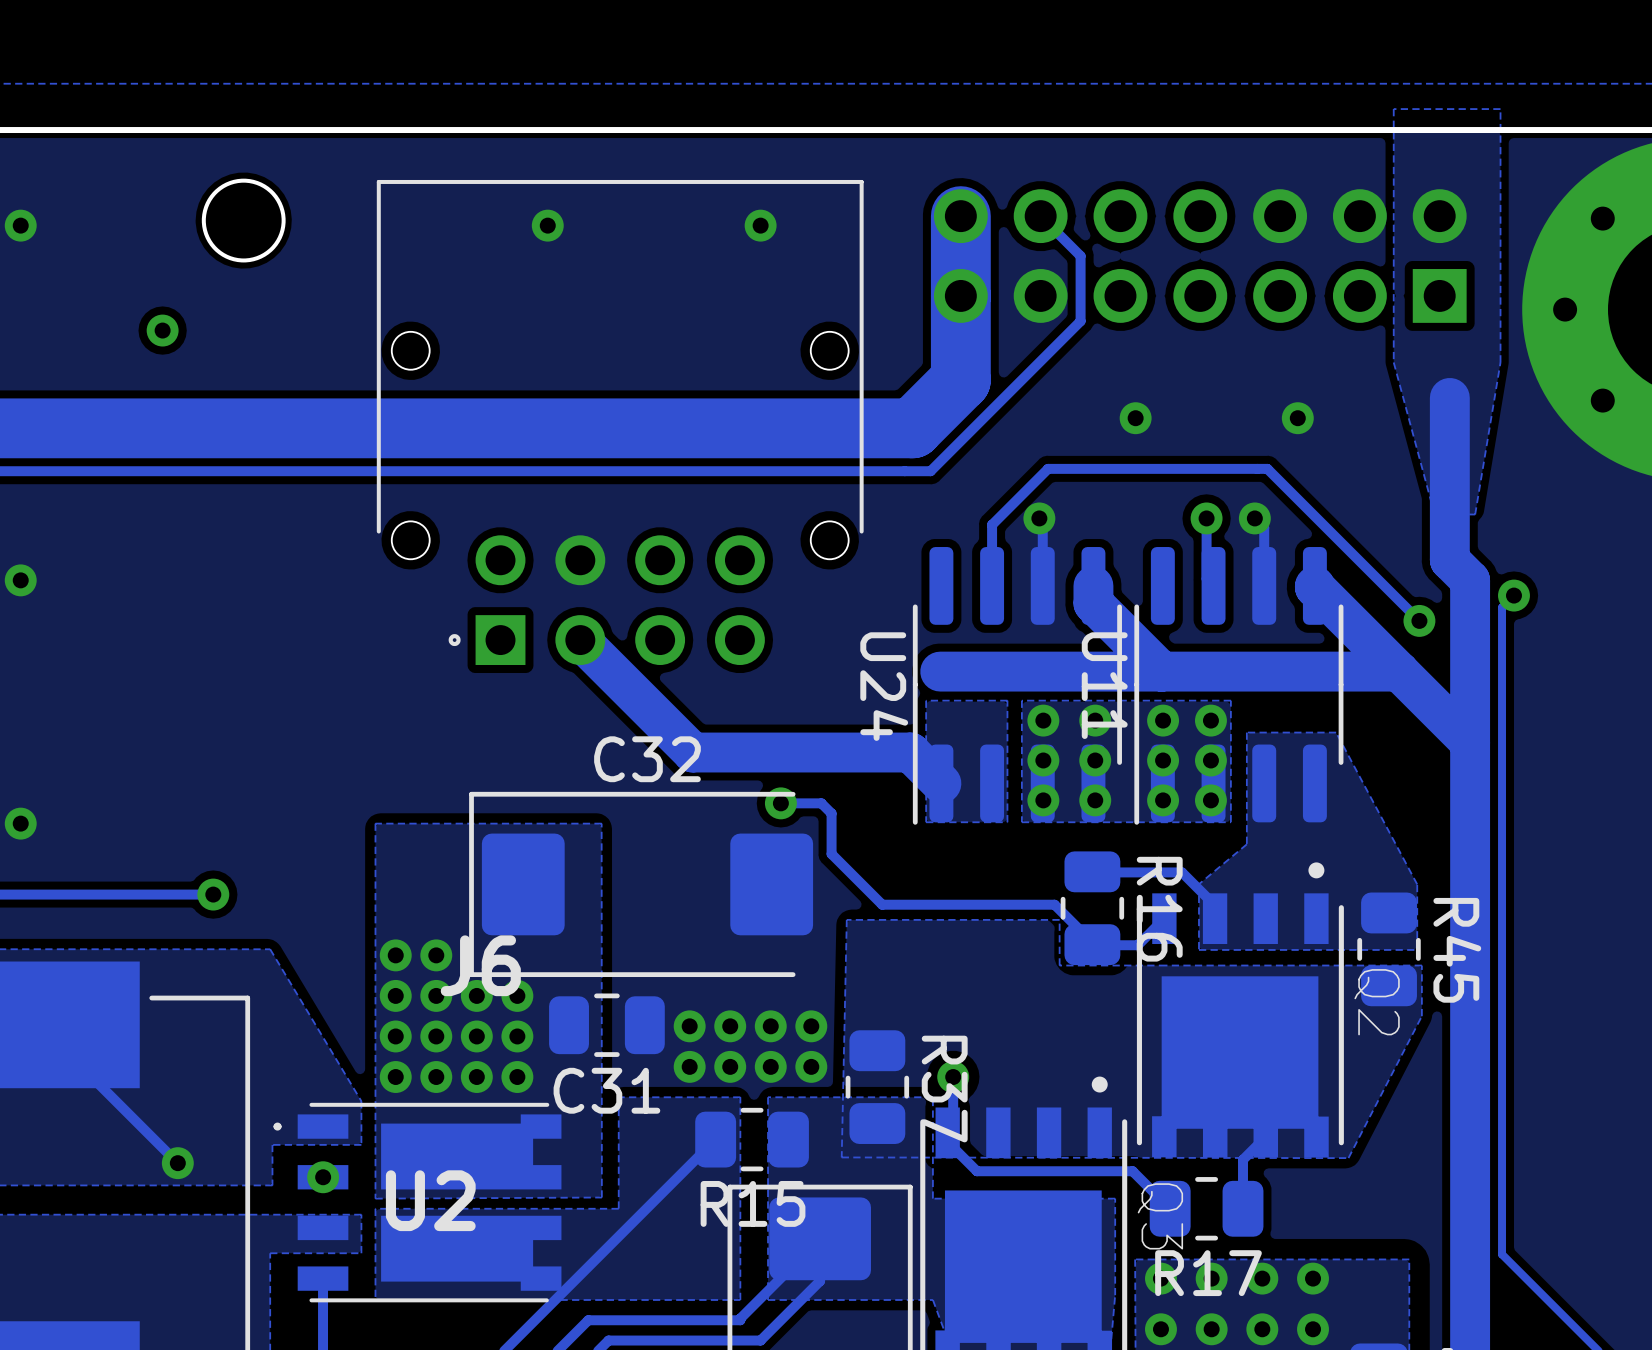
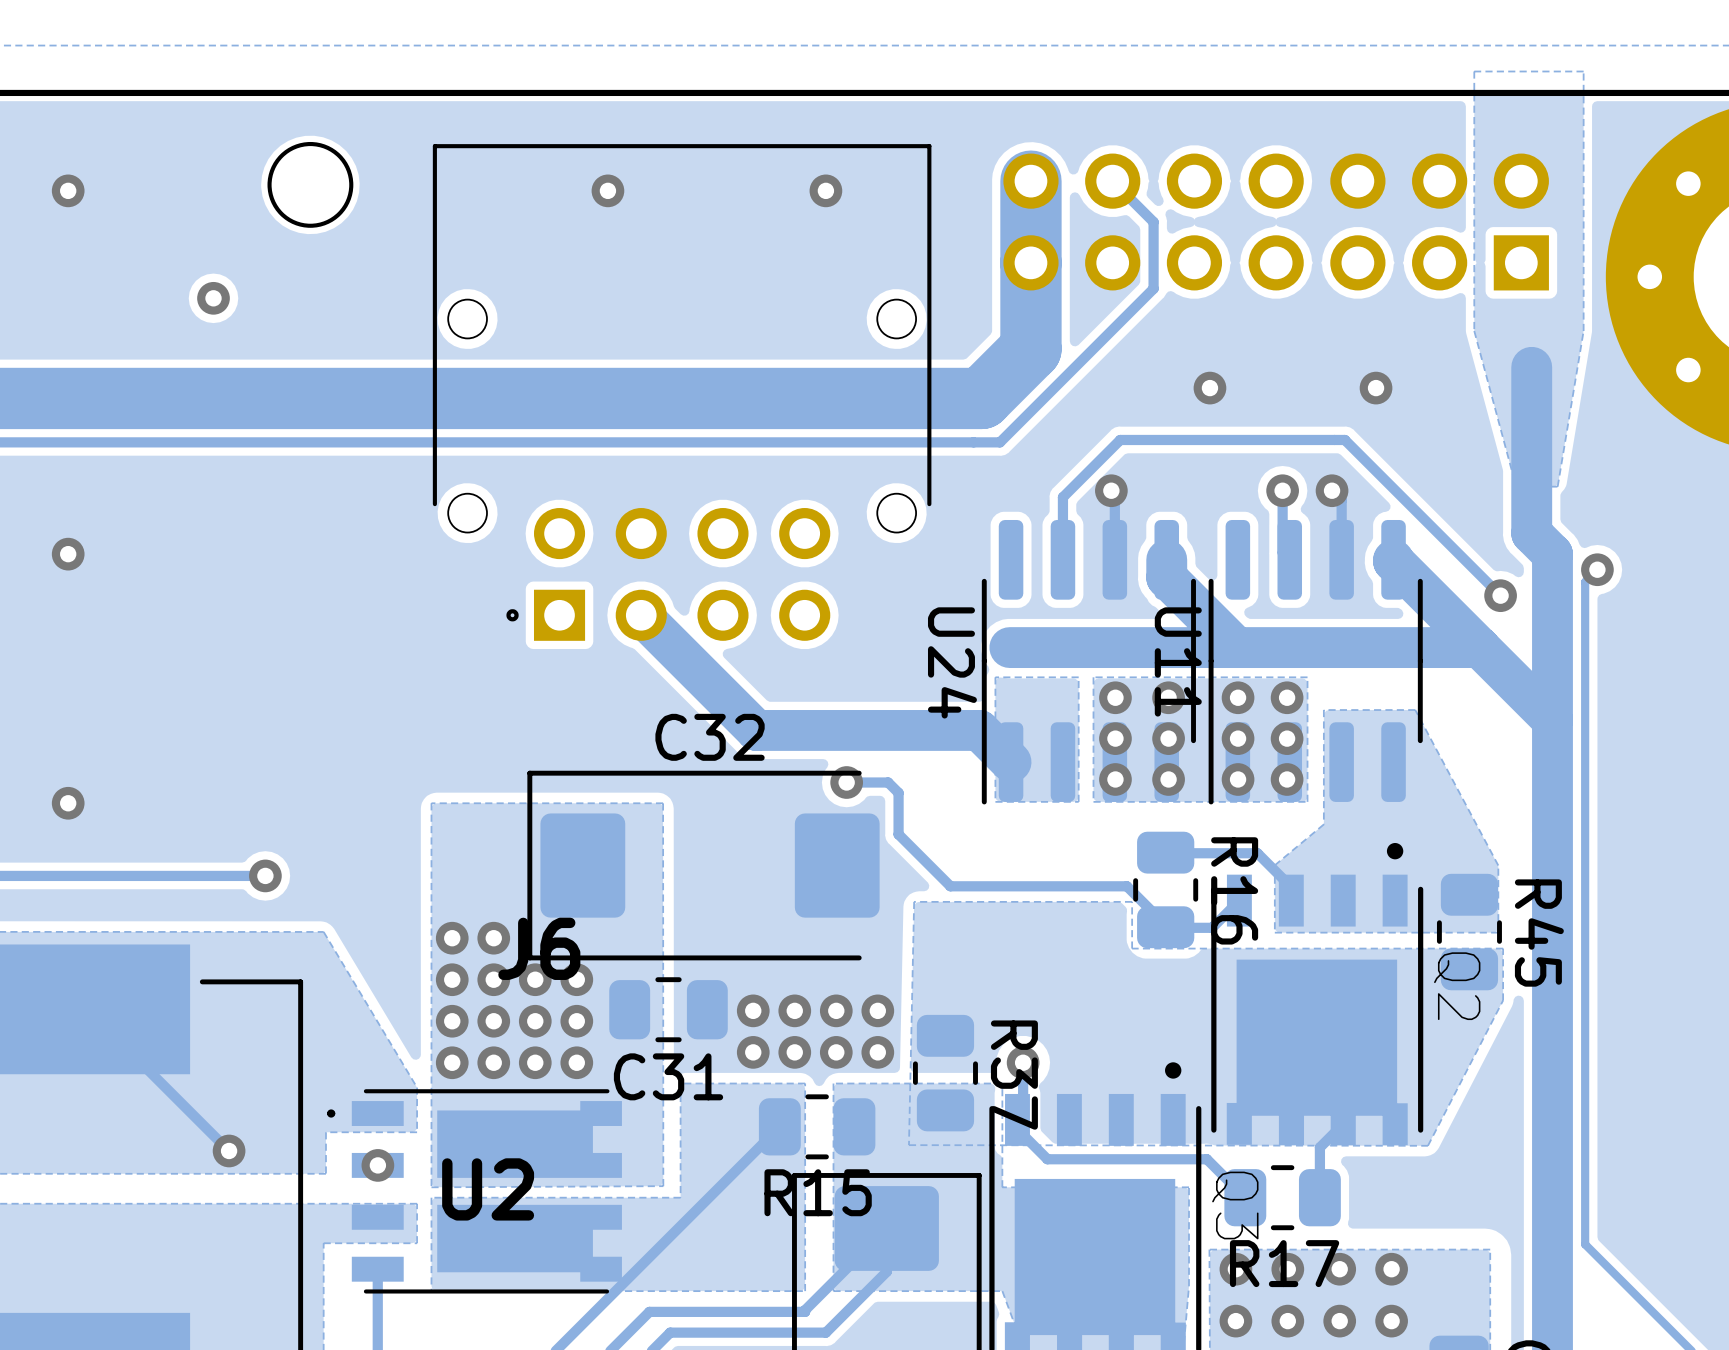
round board edge position: (243, 220) -> (310, 184)

